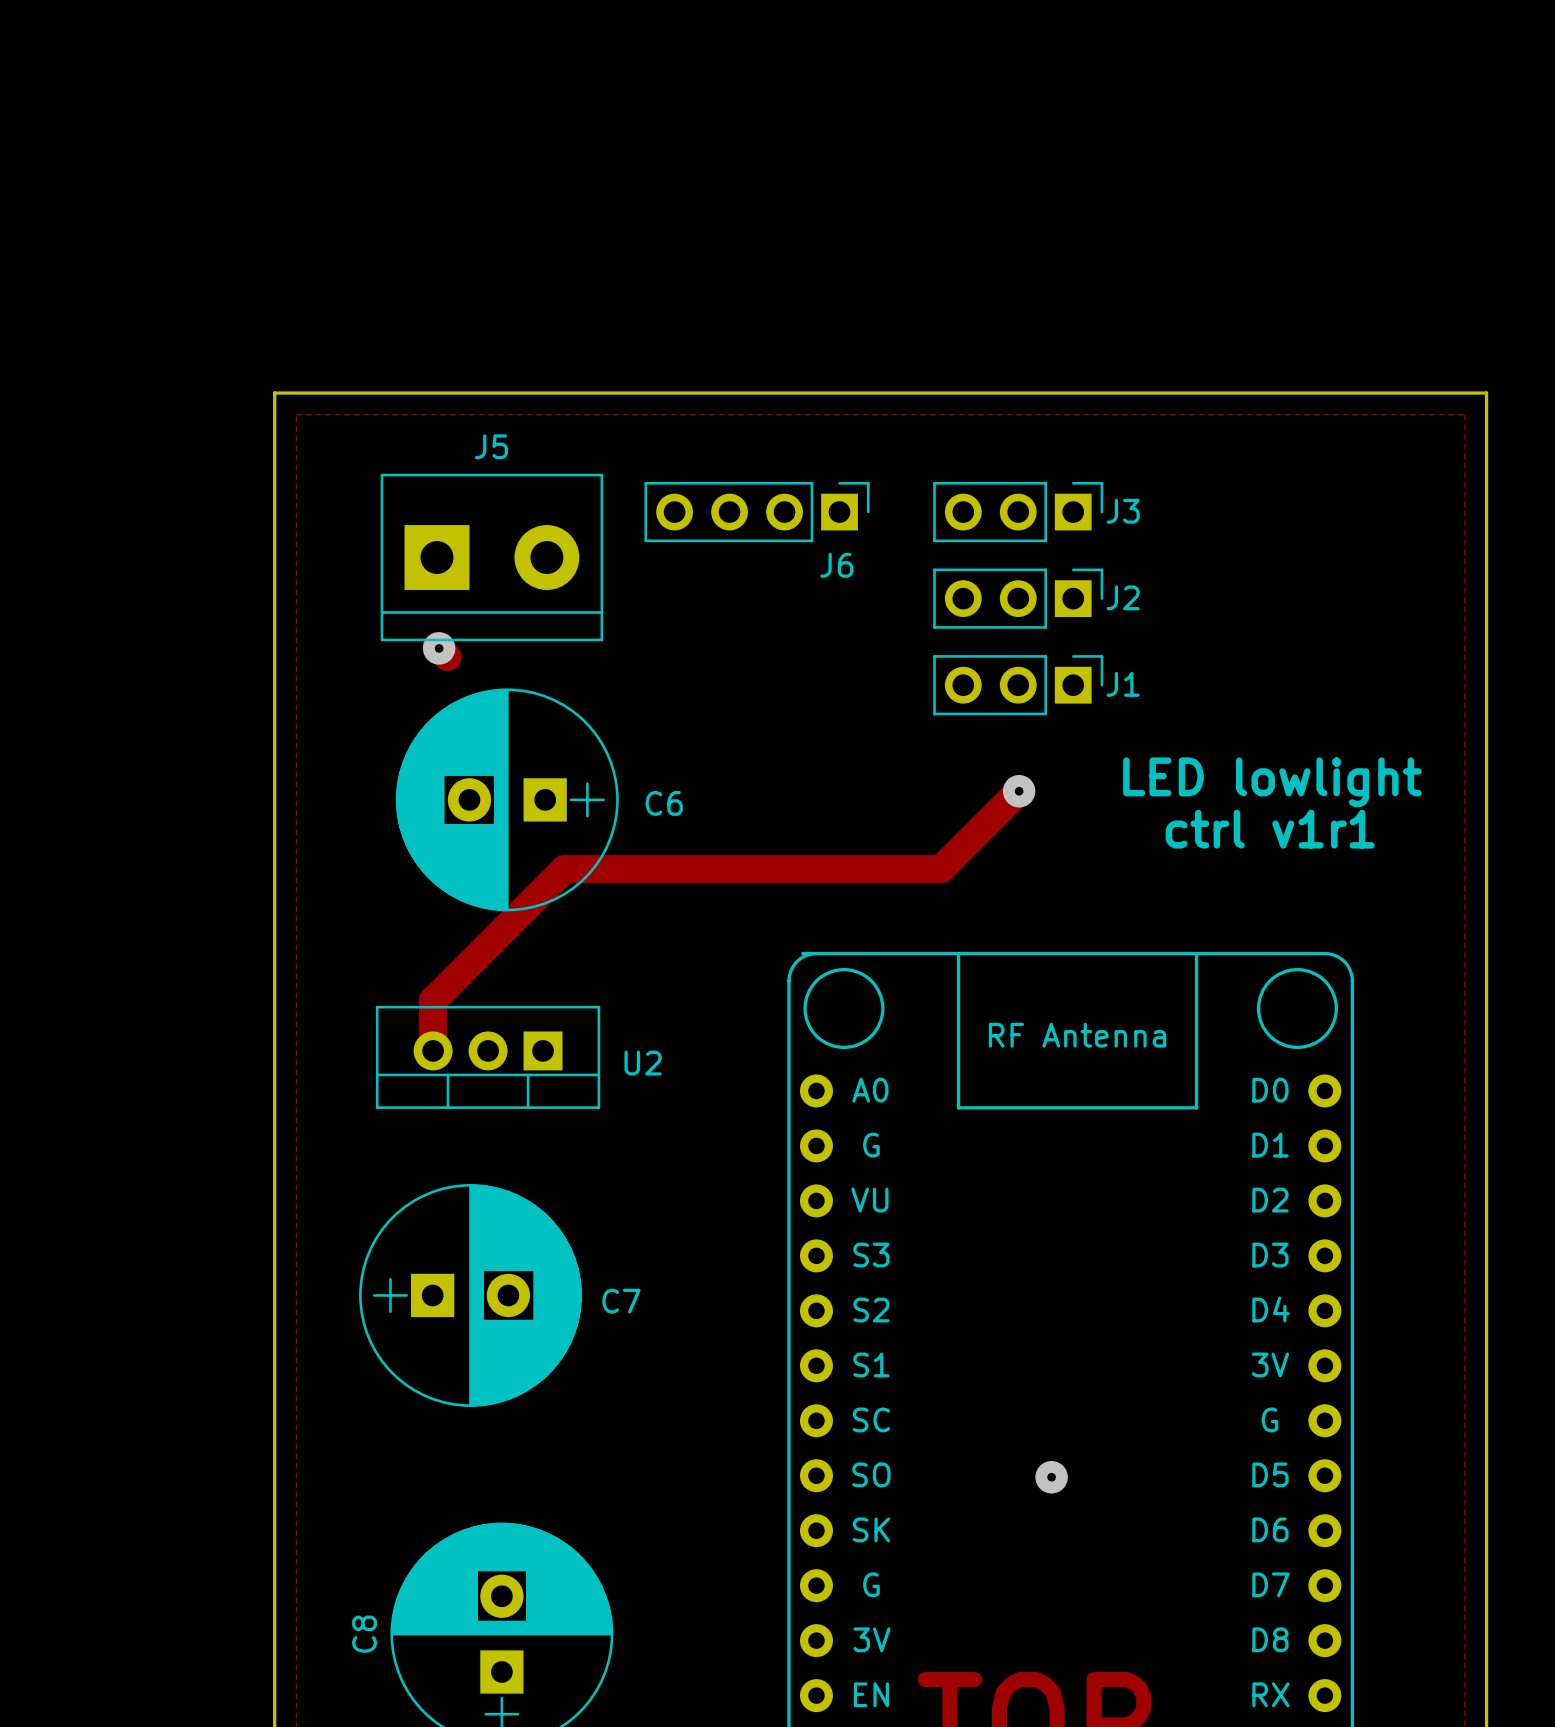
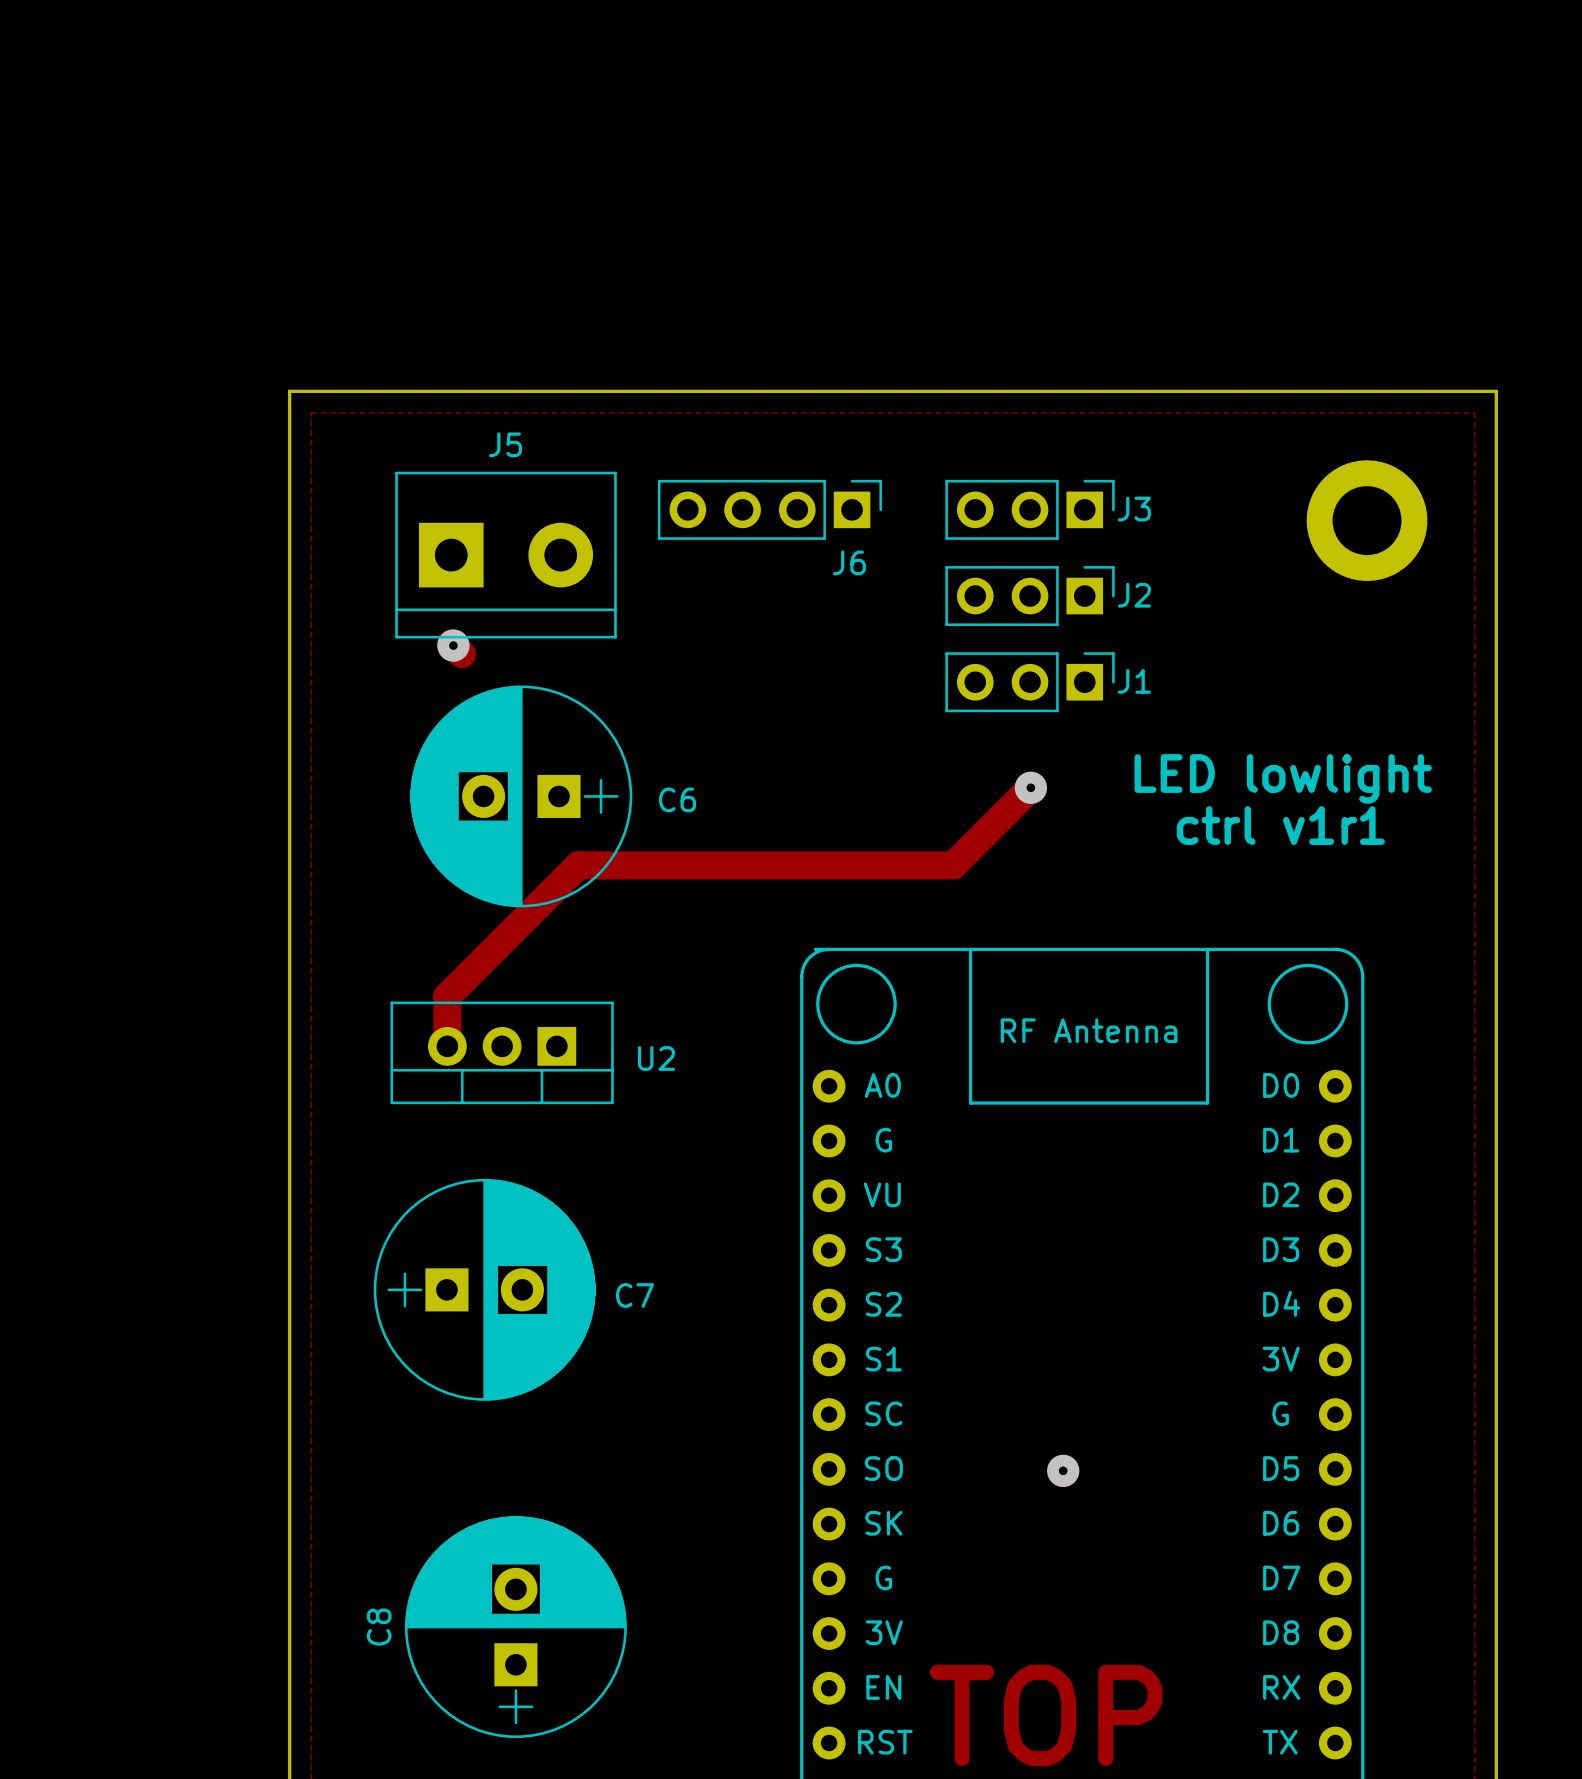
part: none -> (1367, 520)

